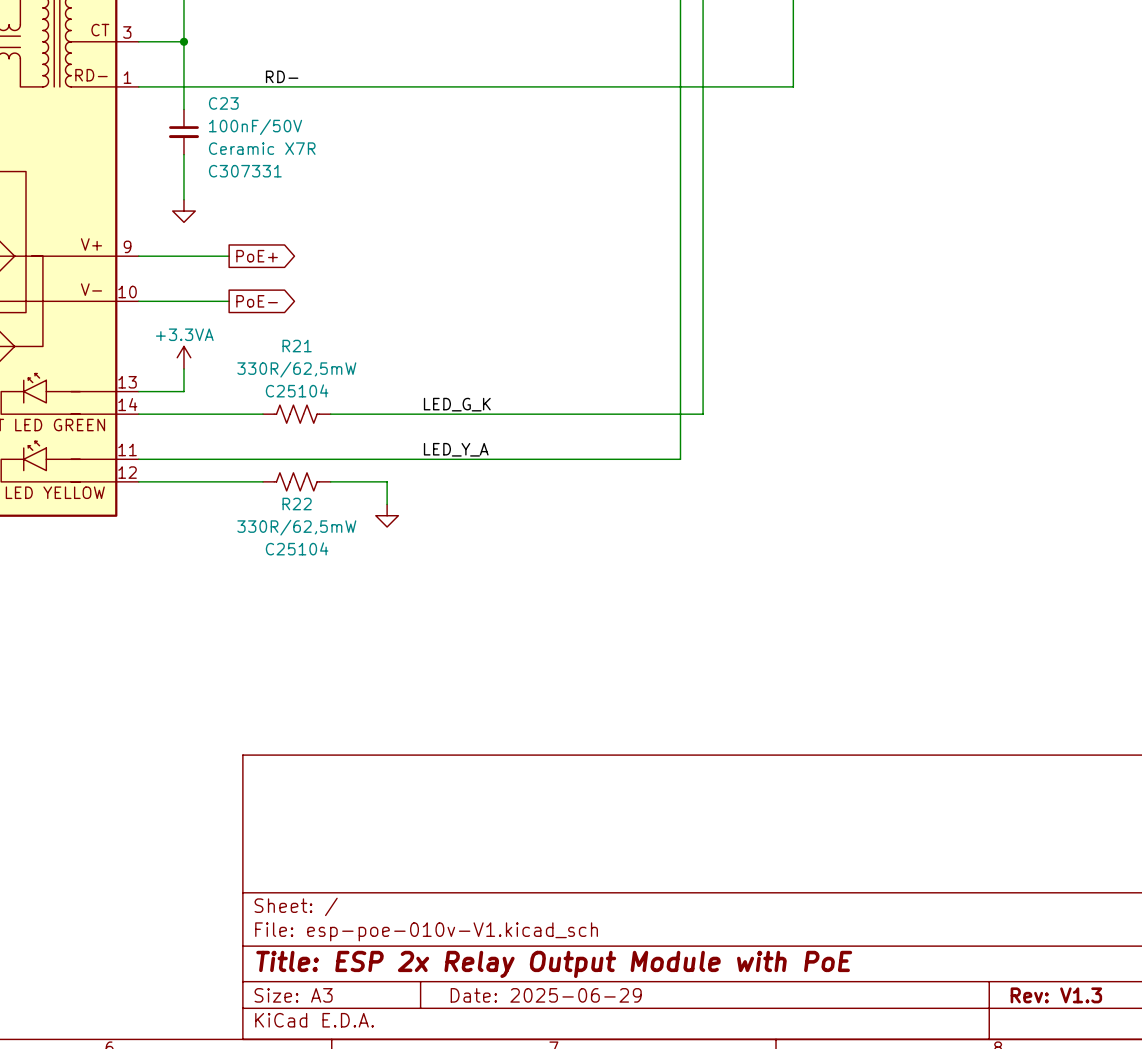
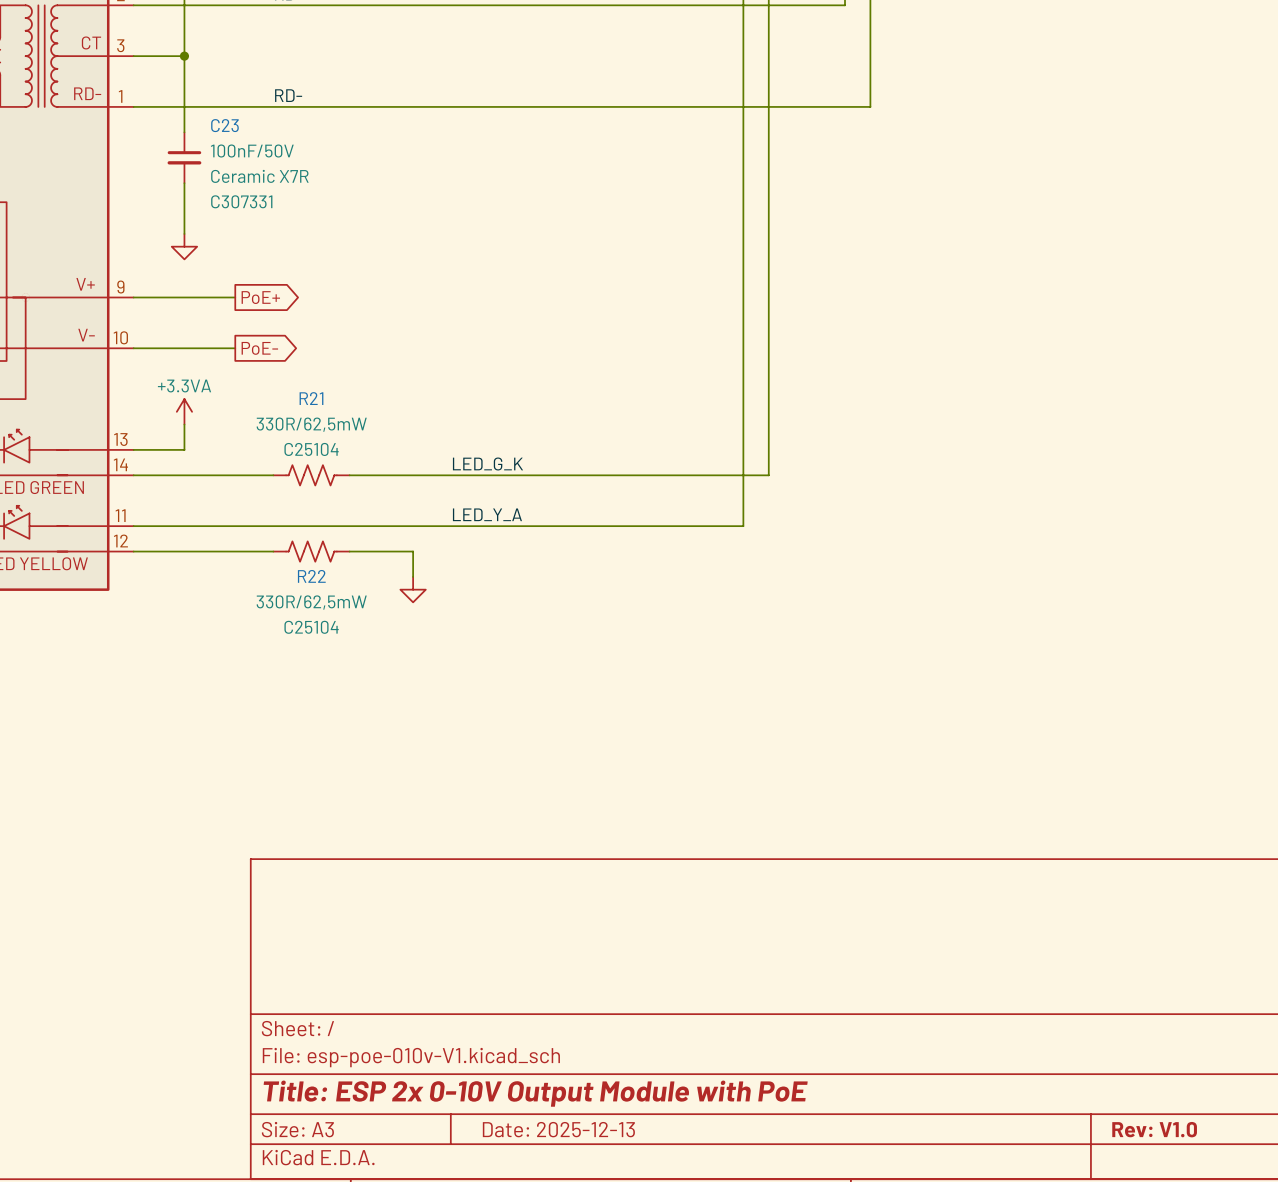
title block: Title: ESP 2x Relay Output Module with PoE (554, 964) -> Title: ESP 2x 0-10V Output Module with PoE (535, 1093)
title block: Date: 2025-06-29 (546, 995) -> Date: 2025-12-13 (558, 1129)
title block: Rev: V1.3 (1056, 995) -> Rev: V1.0 (1154, 1129)

